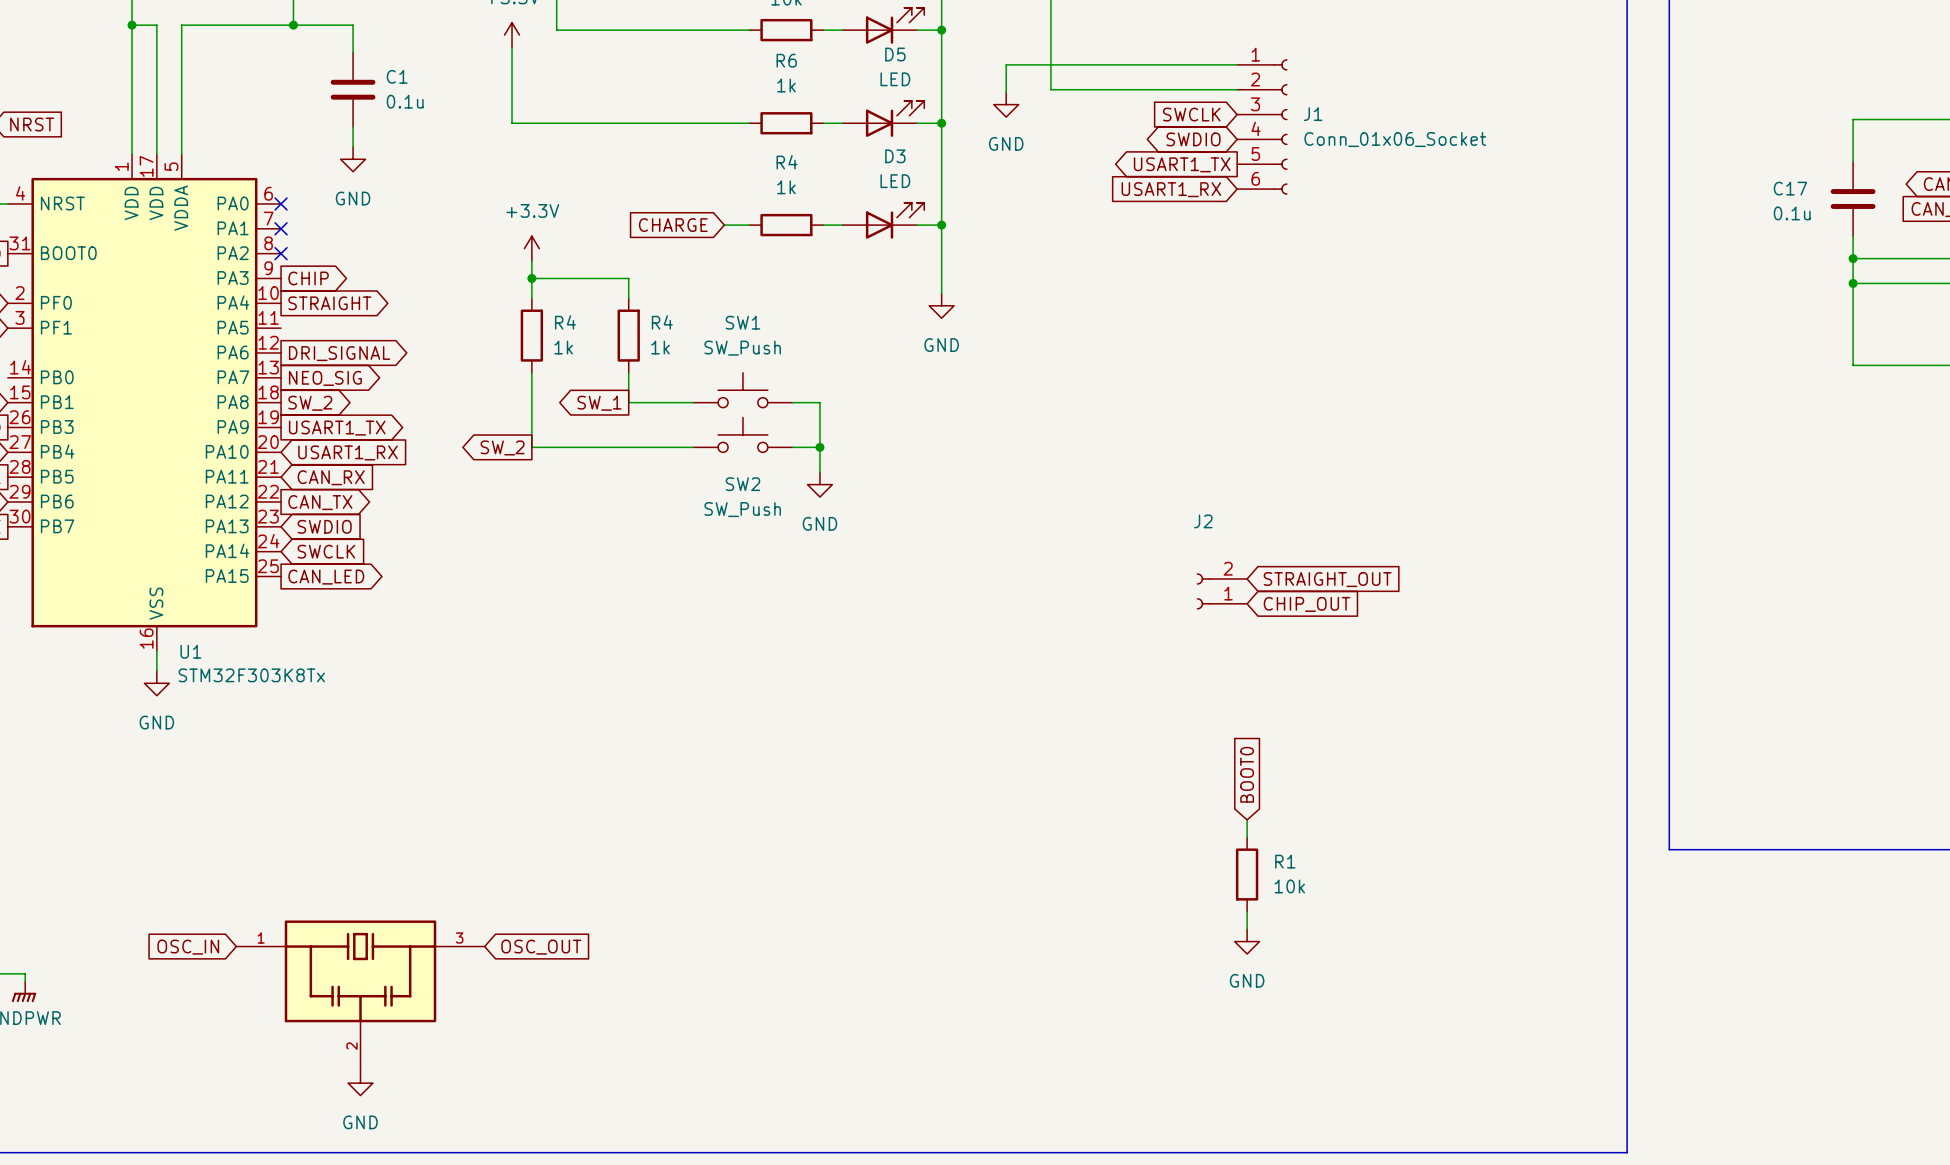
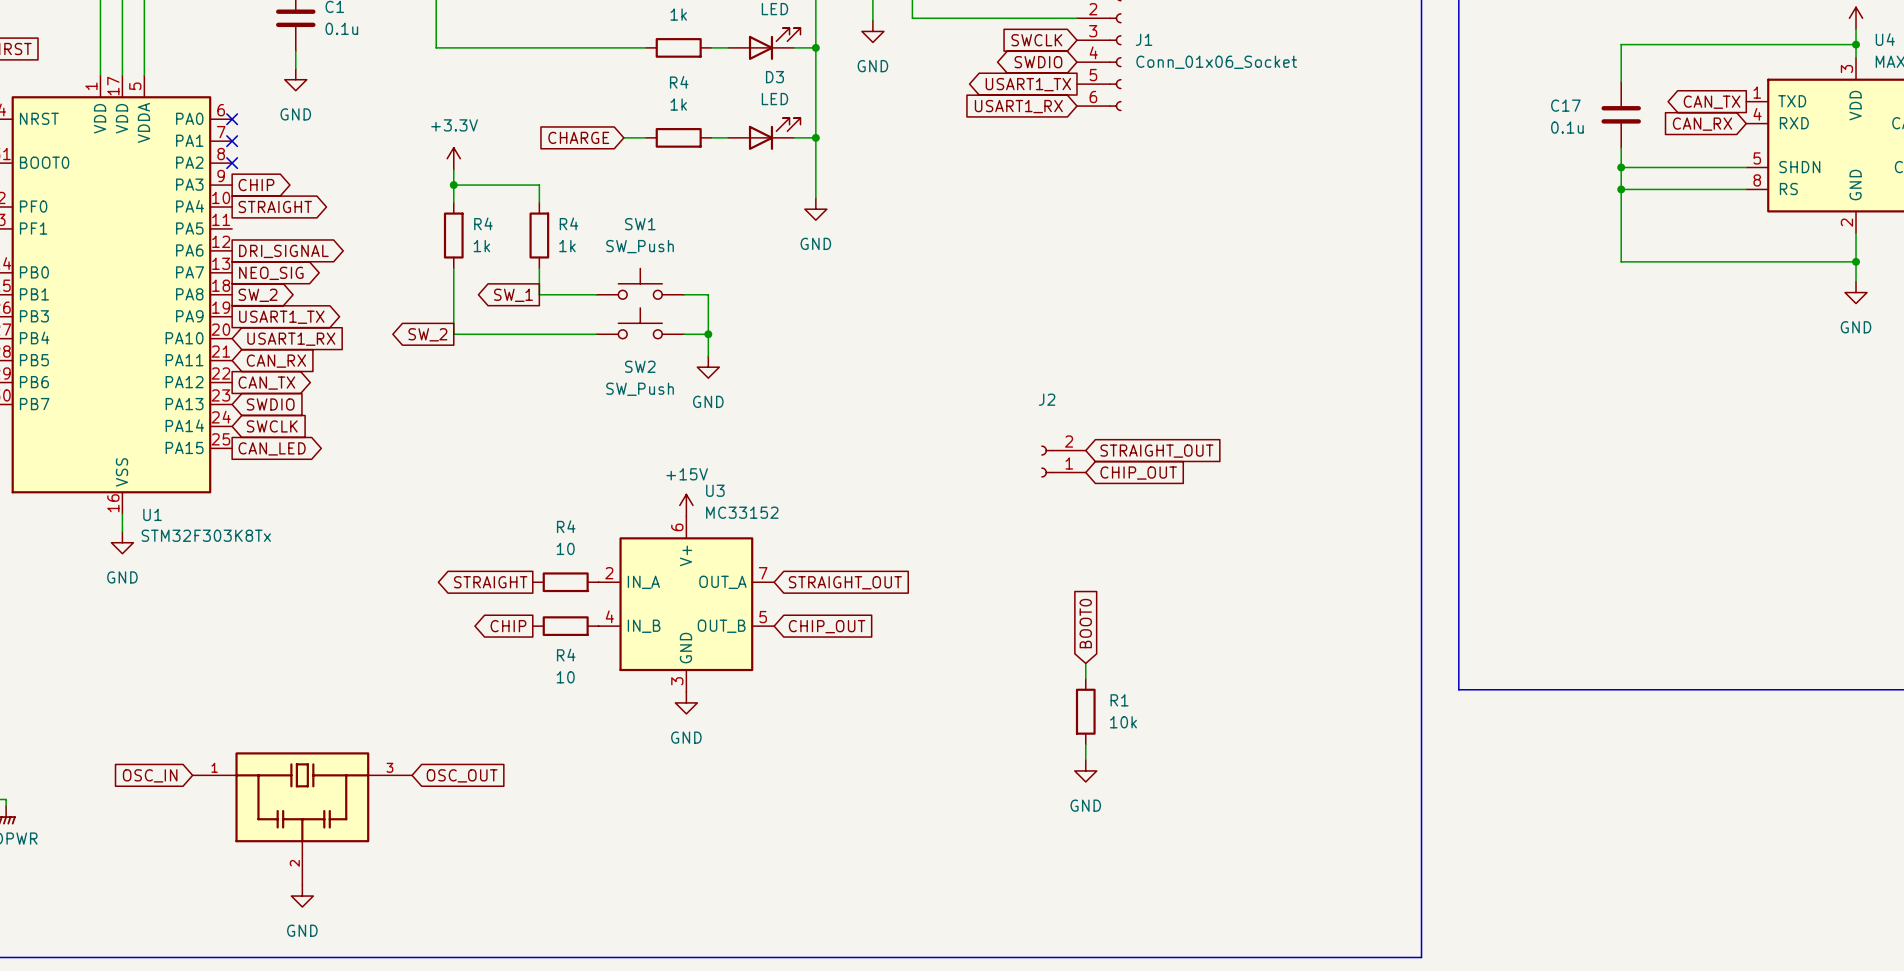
power symbol: none -> +15V (686, 505)
global label: none -> STRAIGHT (490, 582)
R4: none -> 10 (565, 582)
global label: none -> STRAIGHT_OUT (845, 582)
U3: none -> MC33152 (686, 604)
global label: none -> CHIP (508, 626)
R4: none -> 10 (565, 626)
global label: none -> CHIP_OUT (827, 626)
power symbol: none -> GND (686, 702)

